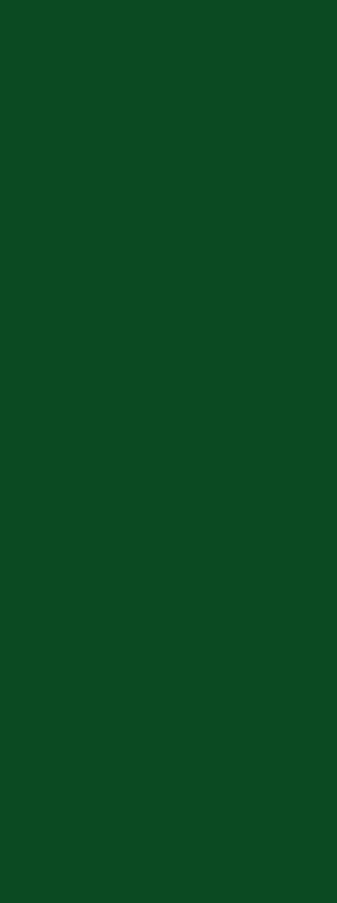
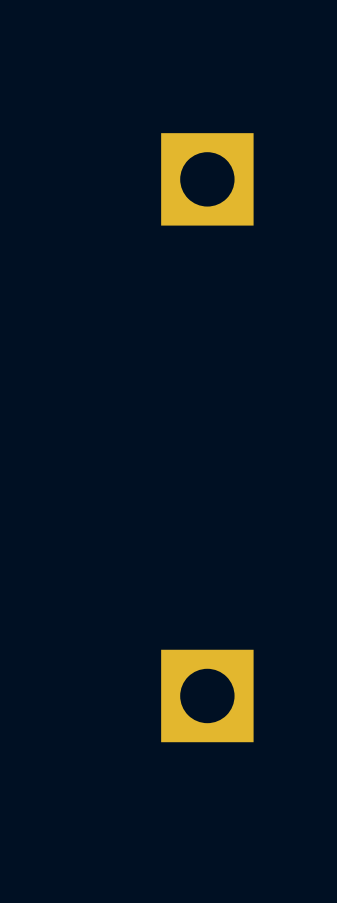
part: none -> (207, 179)
part: none -> (207, 695)

